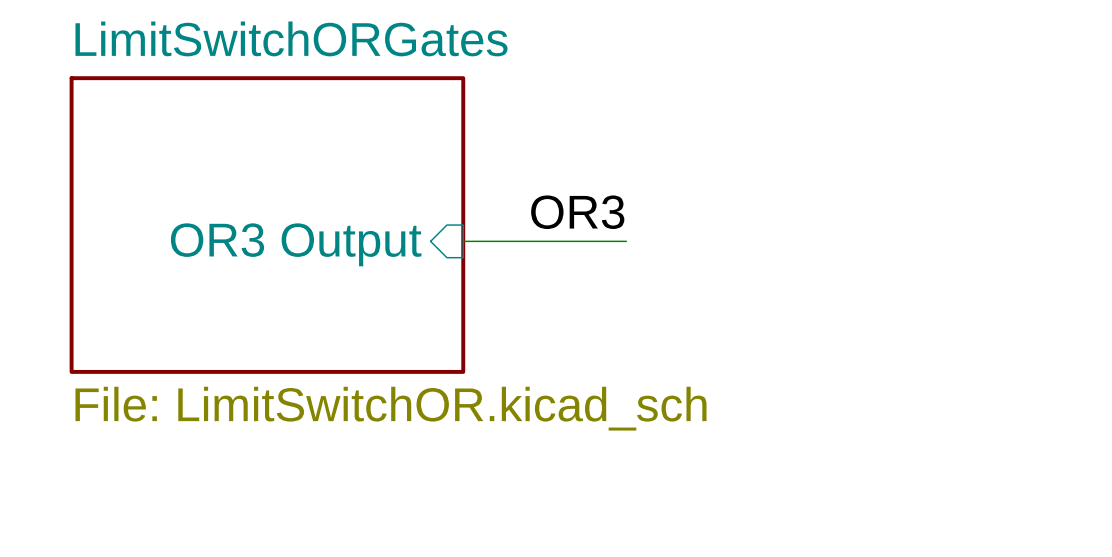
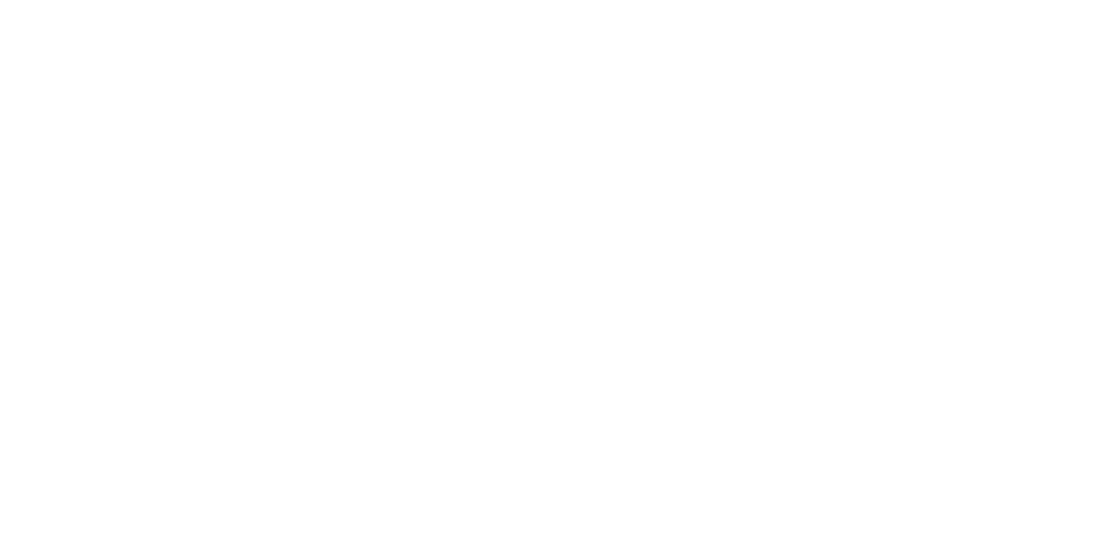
label: OR3 (577, 212) -> none
sheet LimitSwitchORGates: File: LimitSwitchOR.kicad_sch (267, 225) -> none
wire: (463, 241) (626, 241) -> none
sheet pin: OR3 Output (296, 244) -> none

